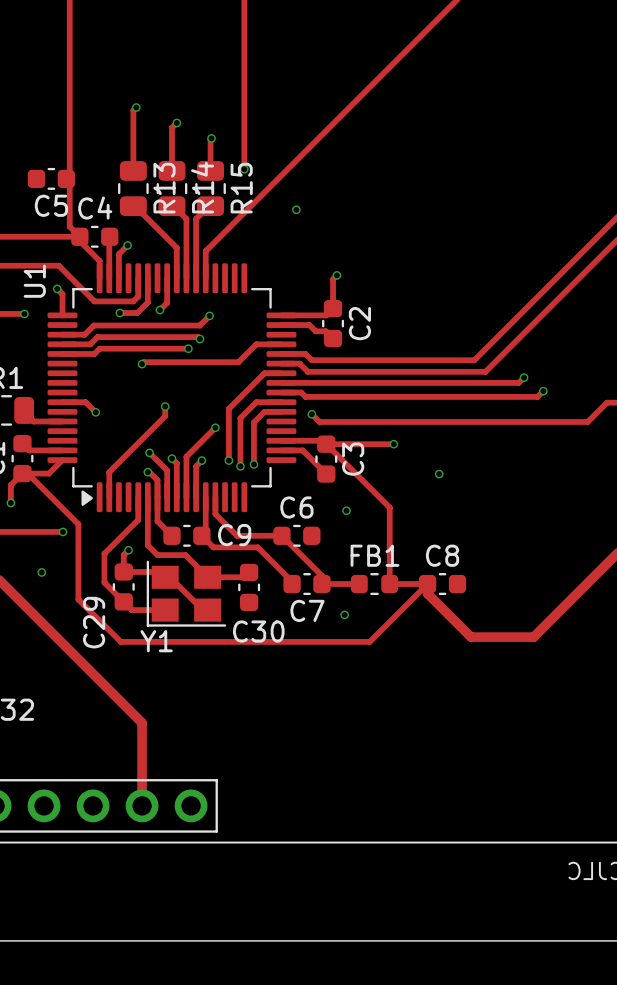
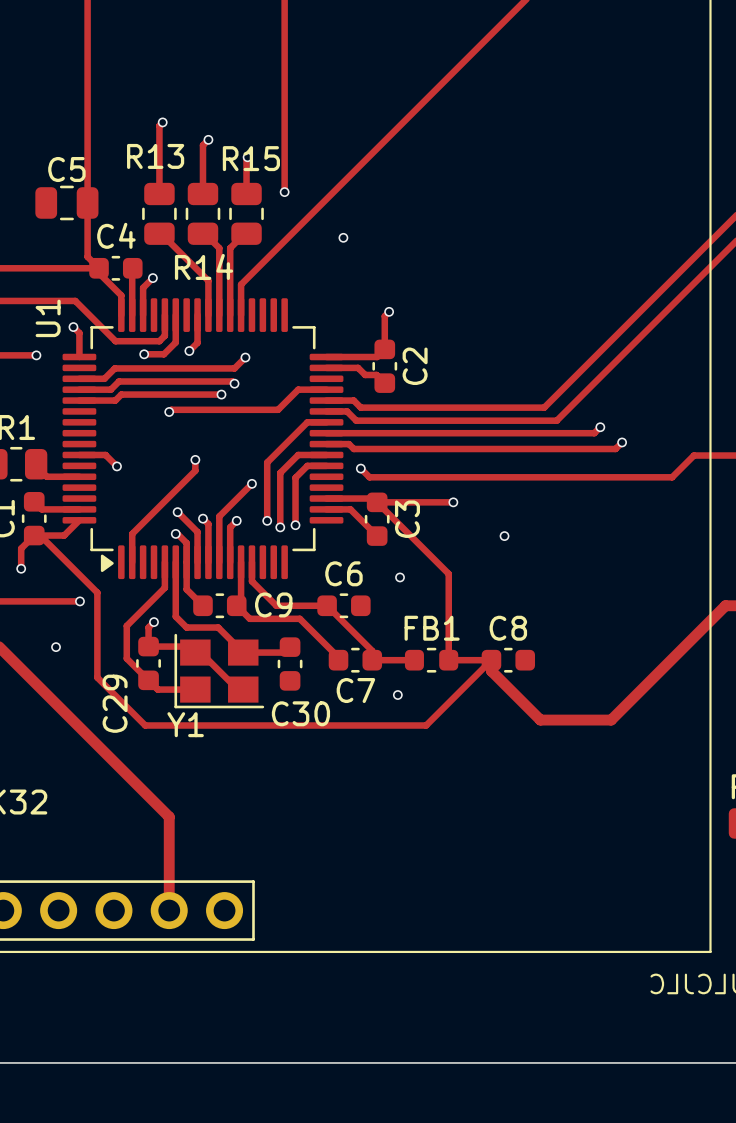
C5 footprint: [27, 167, 76, 190] -> [35, 185, 99, 221]
R14 name rotation: 0° (202, 187) -> 90° clockwise (204, 266)
R13 name rotation: 0° (164, 188) -> 90° clockwise (155, 156)
R15 name rotation: 0° (241, 188) -> 90° clockwise (251, 158)
C5 name position: C5 (51, 205) -> C5 (66, 169)

